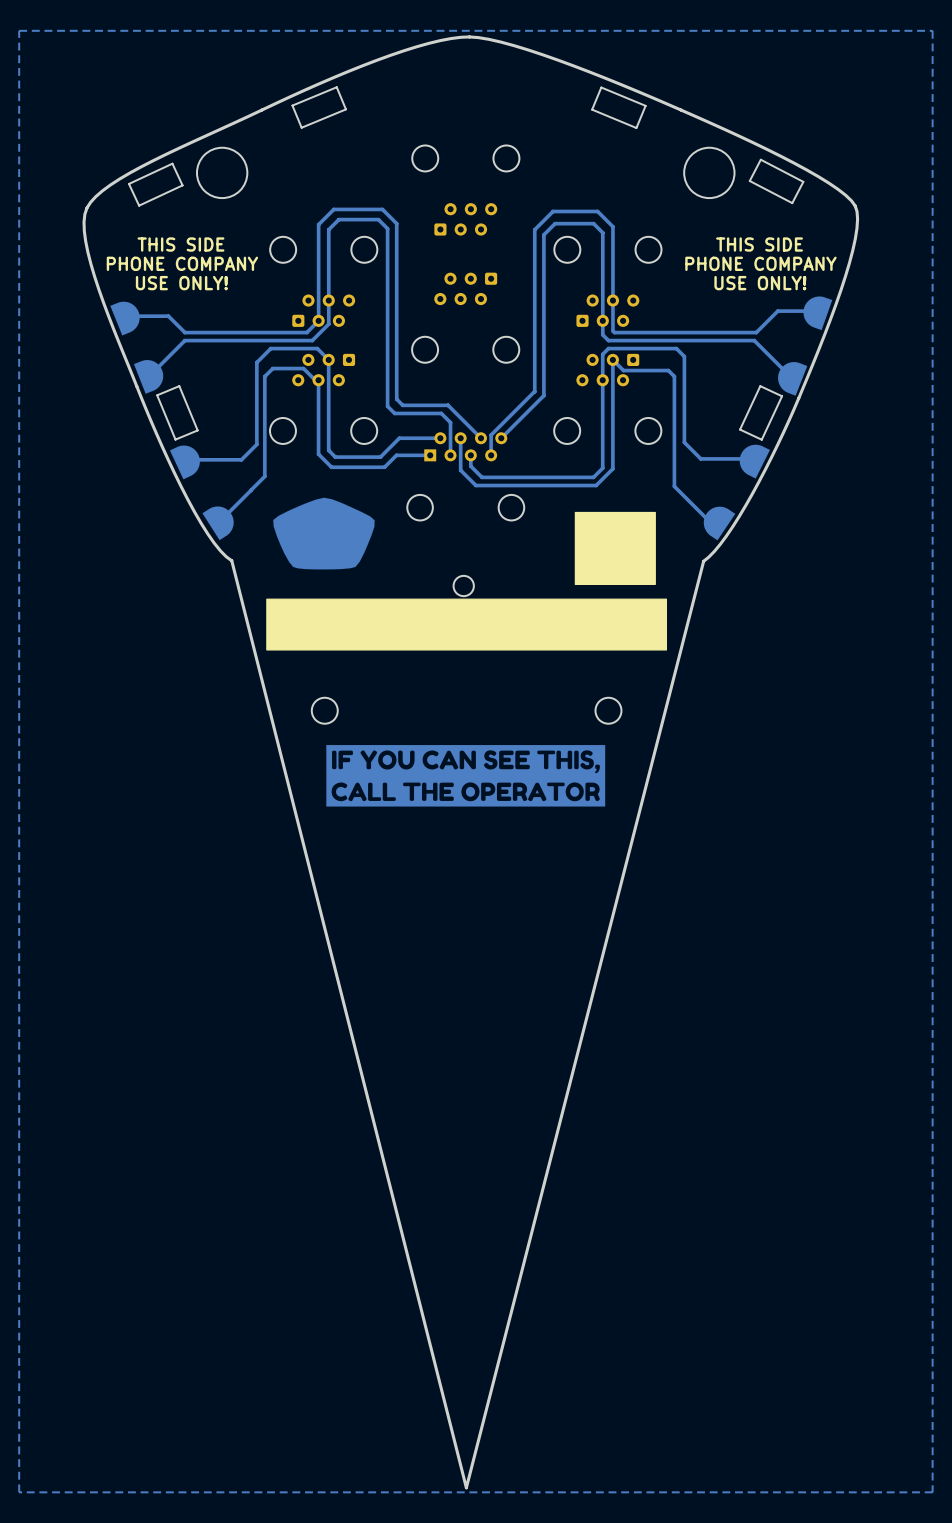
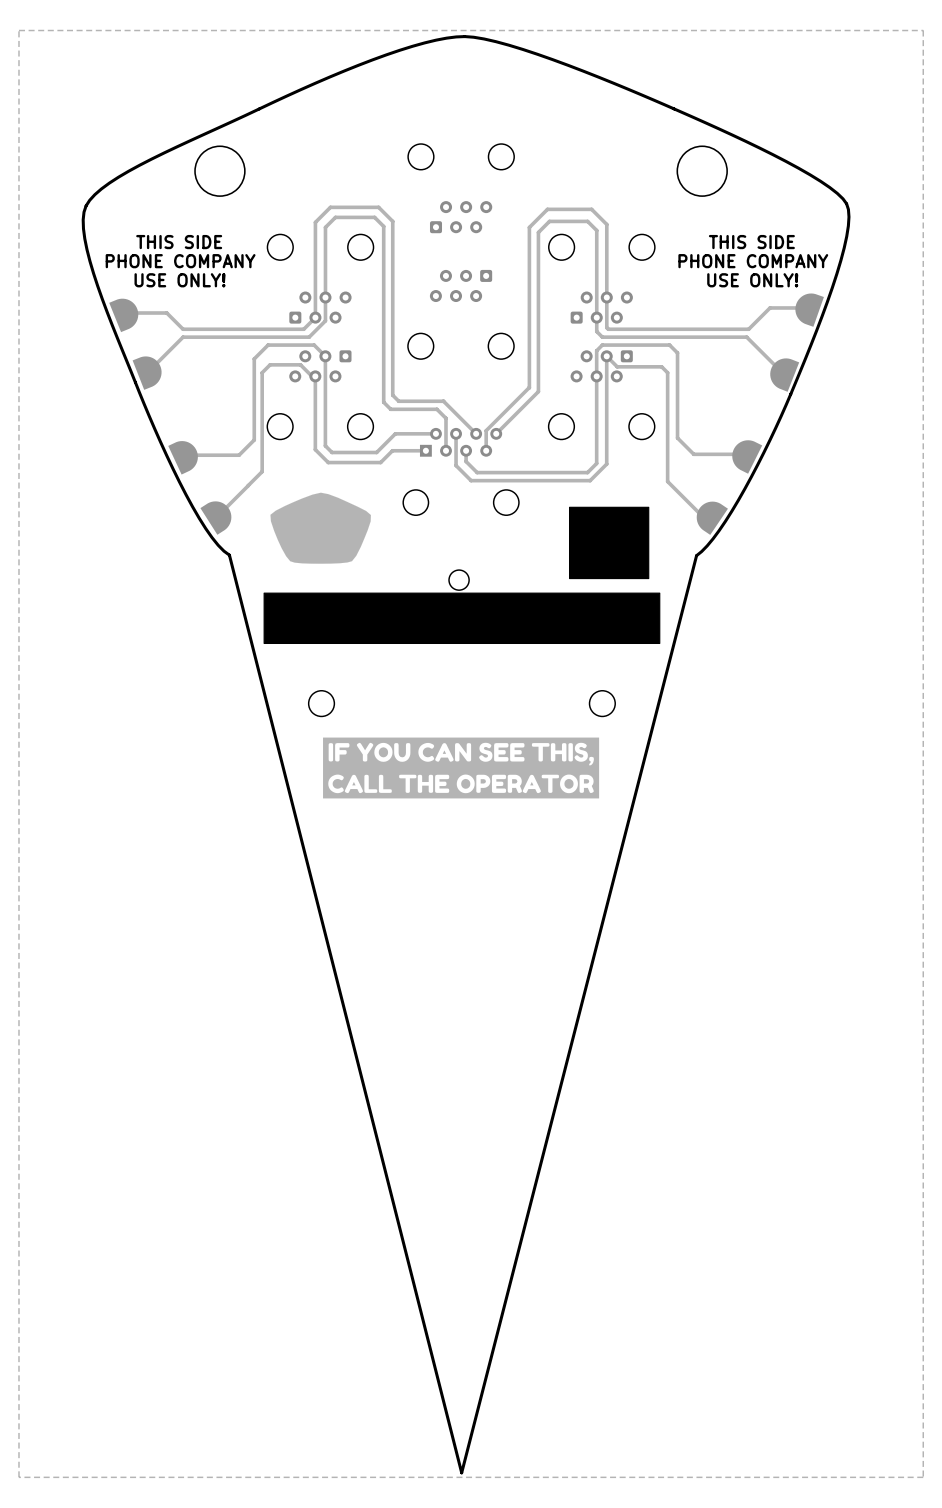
board edge: (336, 87) (292, 105) (301, 127) (345, 109) (336, 87) -> none
board edge: (601, 87) (645, 105) (636, 128) (592, 109) (601, 87) -> none
board edge: (760, 159) (803, 181) (792, 203) (749, 180) (760, 159) -> none
board edge: (172, 163) (182, 185) (139, 205) (128, 183) (172, 163) -> none
board edge: (179, 386) (197, 430) (175, 439) (157, 395) (179, 386) -> none
board edge: (760, 386) (782, 396) (761, 439) (740, 429) (760, 386) -> none

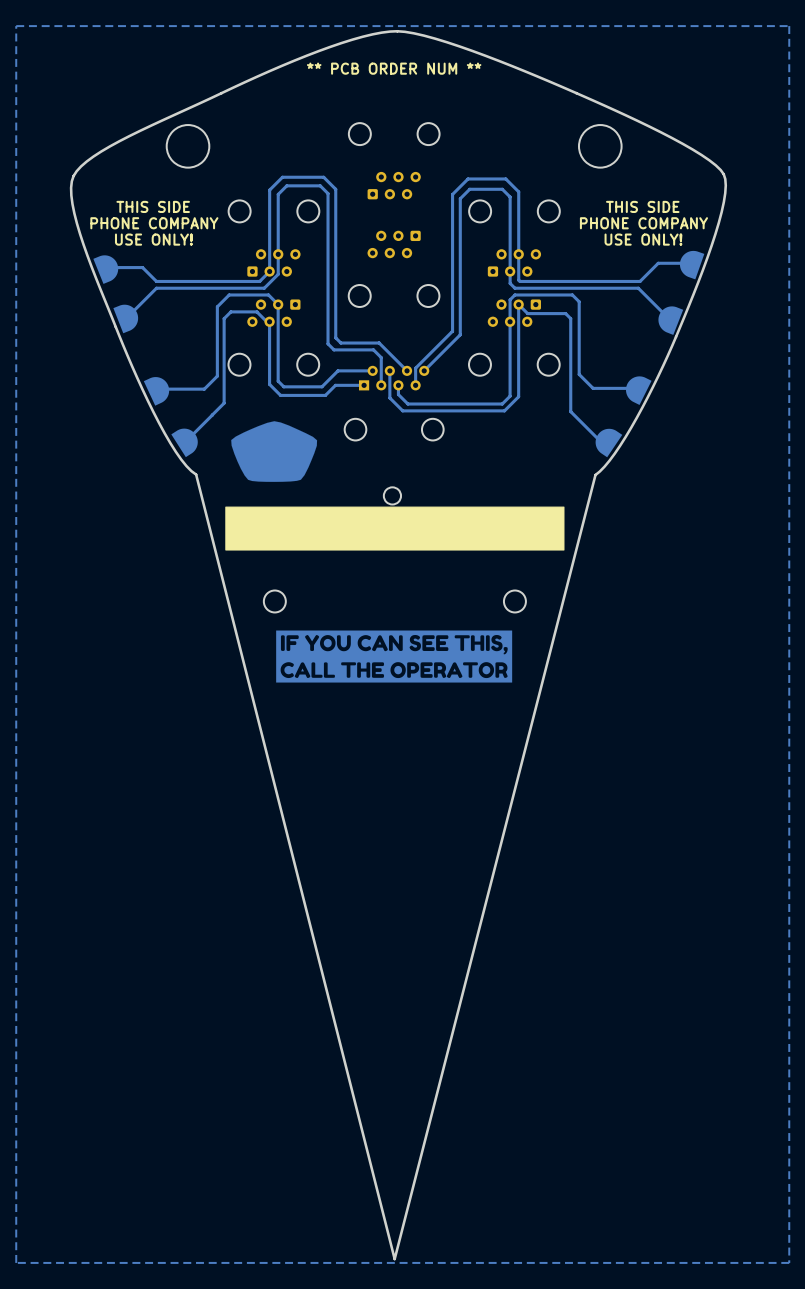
text: none -> ** PCB ORDER NUM ** (394, 68)
drawing: [568, 506, 650, 580] -> none

